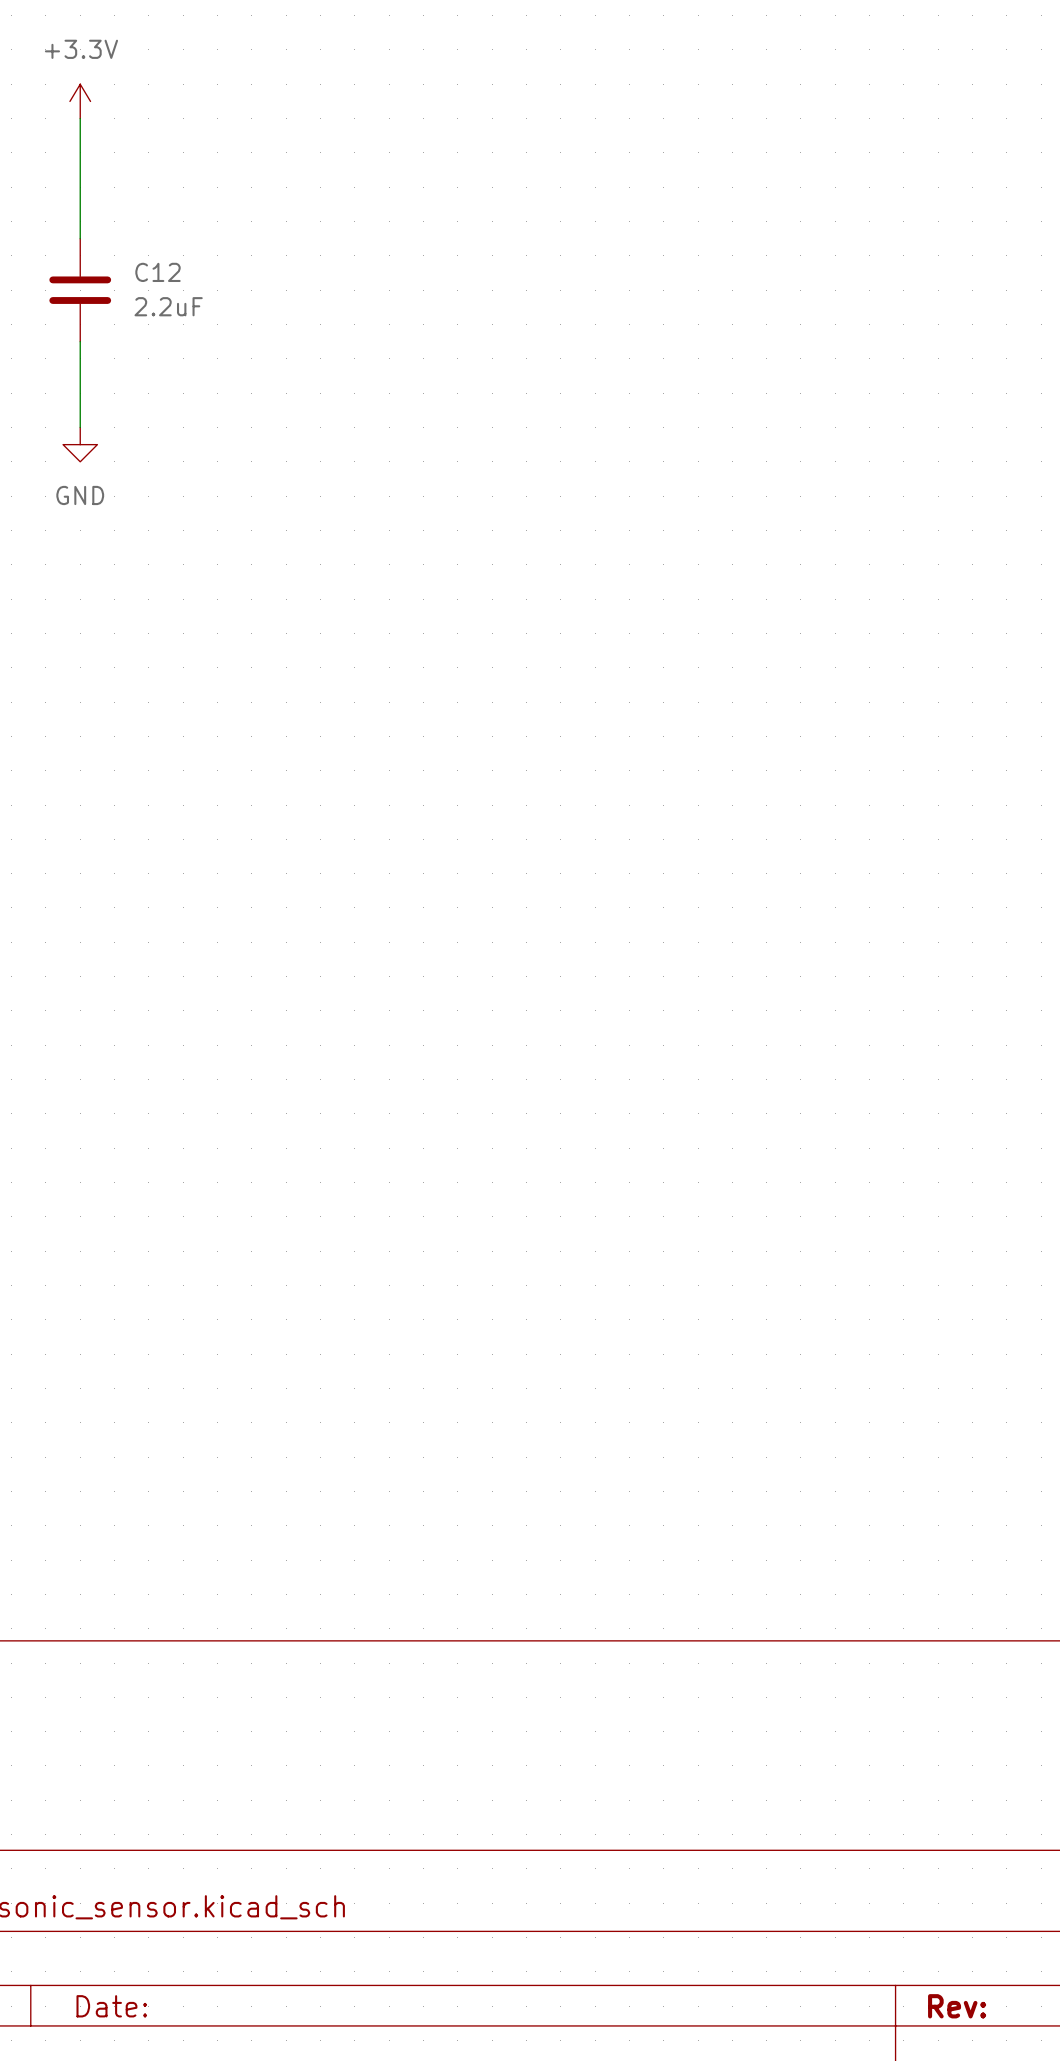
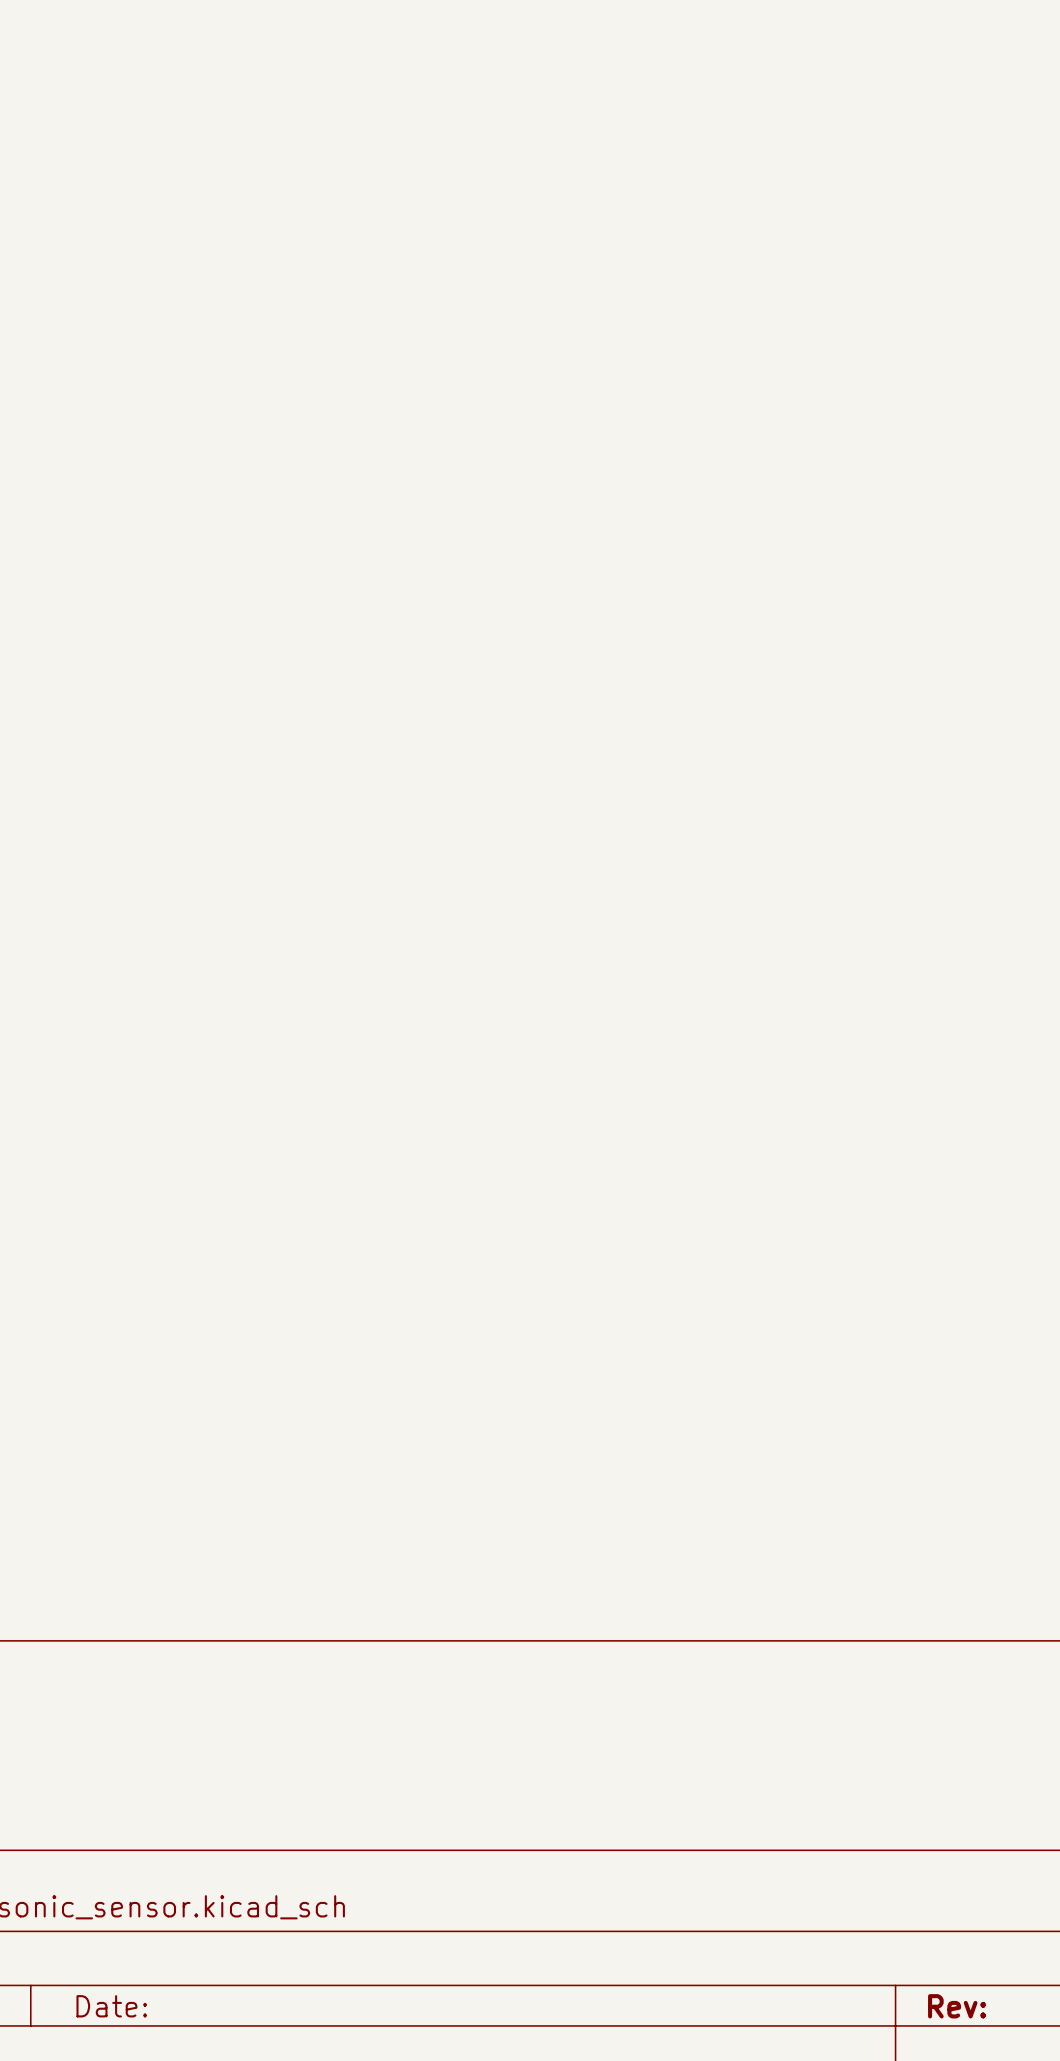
power symbol: +3.3V (80, 101) -> none
wire: (80, 118) (80, 238) -> none
C12: 2.2uF (80, 290) -> none
wire: (80, 341) (80, 427) -> none
power symbol: GND (80, 444) -> none

